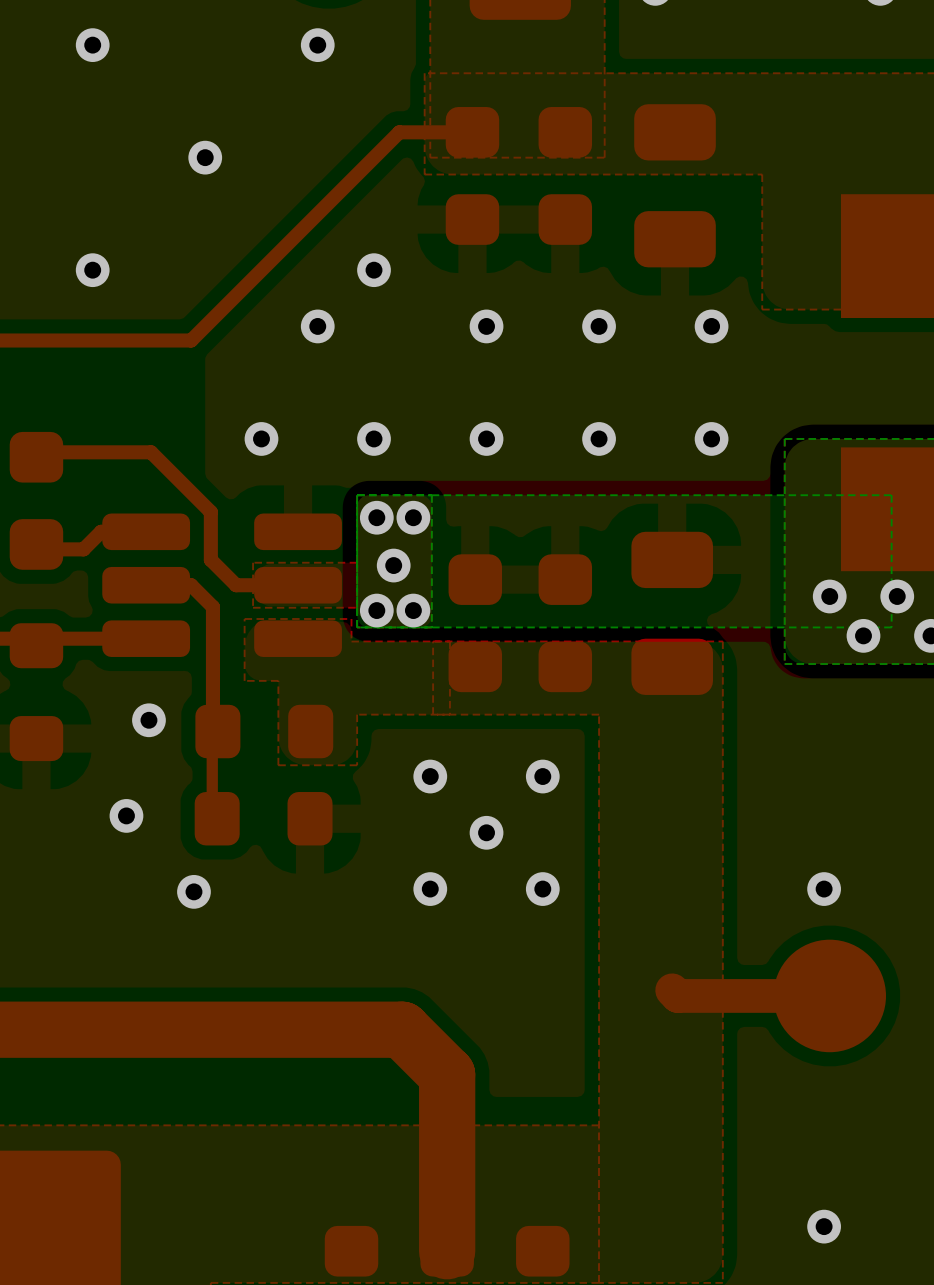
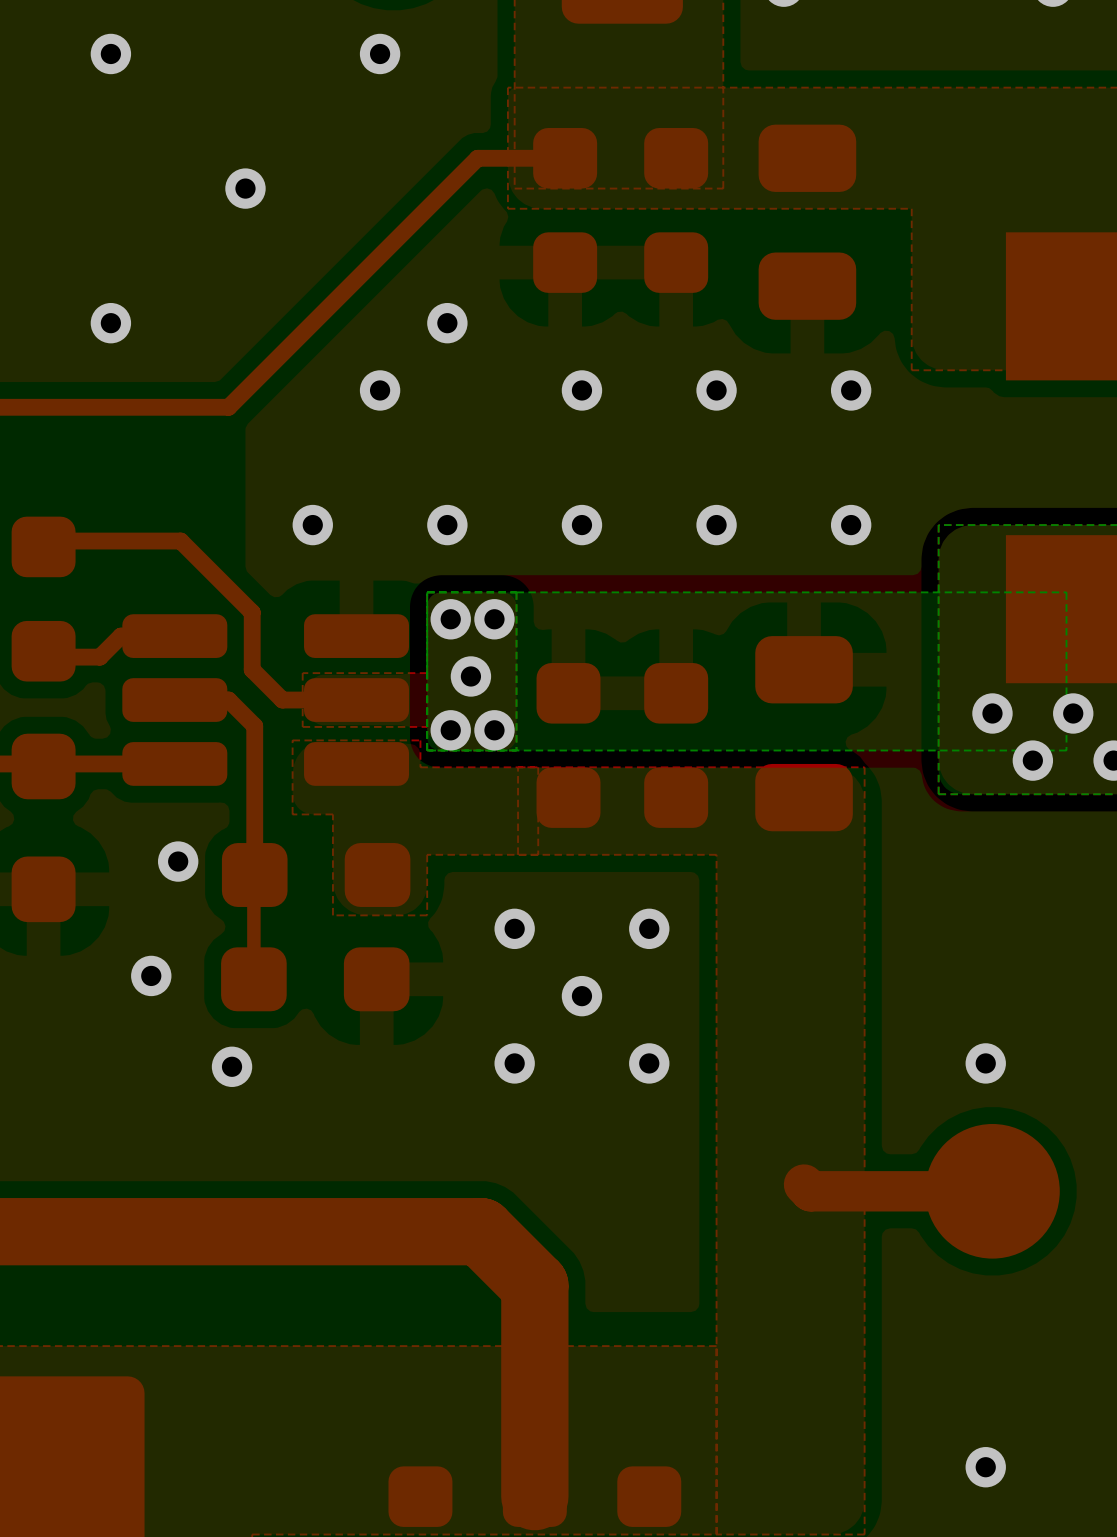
part footprint: [9, 623, 64, 762] -> [11, 733, 76, 923]
part footprint: [195, 704, 334, 759] -> [221, 843, 411, 907]
part footprint: [194, 792, 333, 846] -> [221, 947, 410, 1012]

